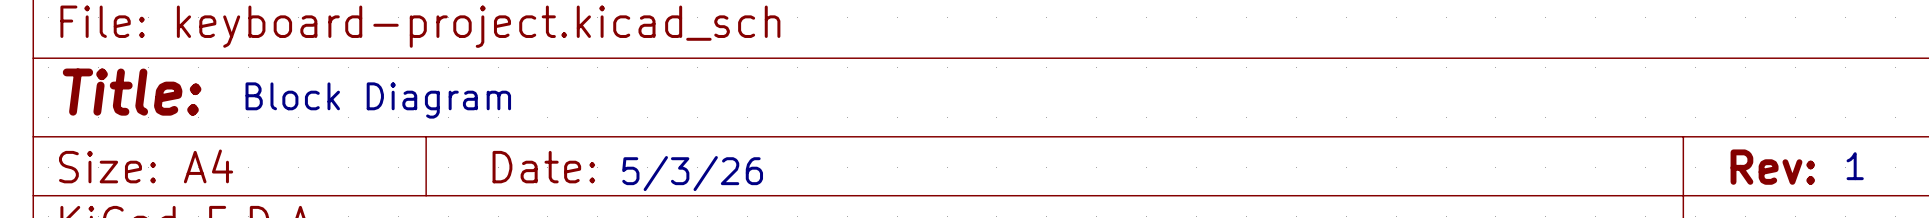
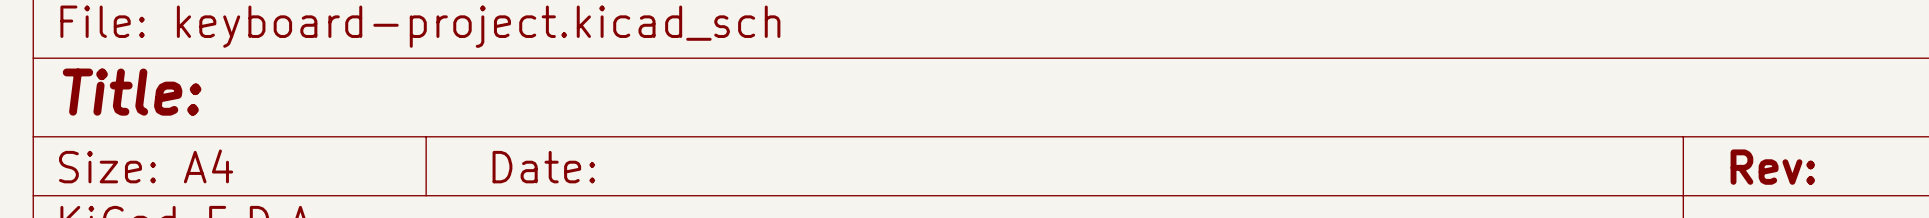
text: Block Diagram (378, 100) -> none
text: 1 (1855, 166) -> none
text: 5/3/26 (692, 173) -> none

